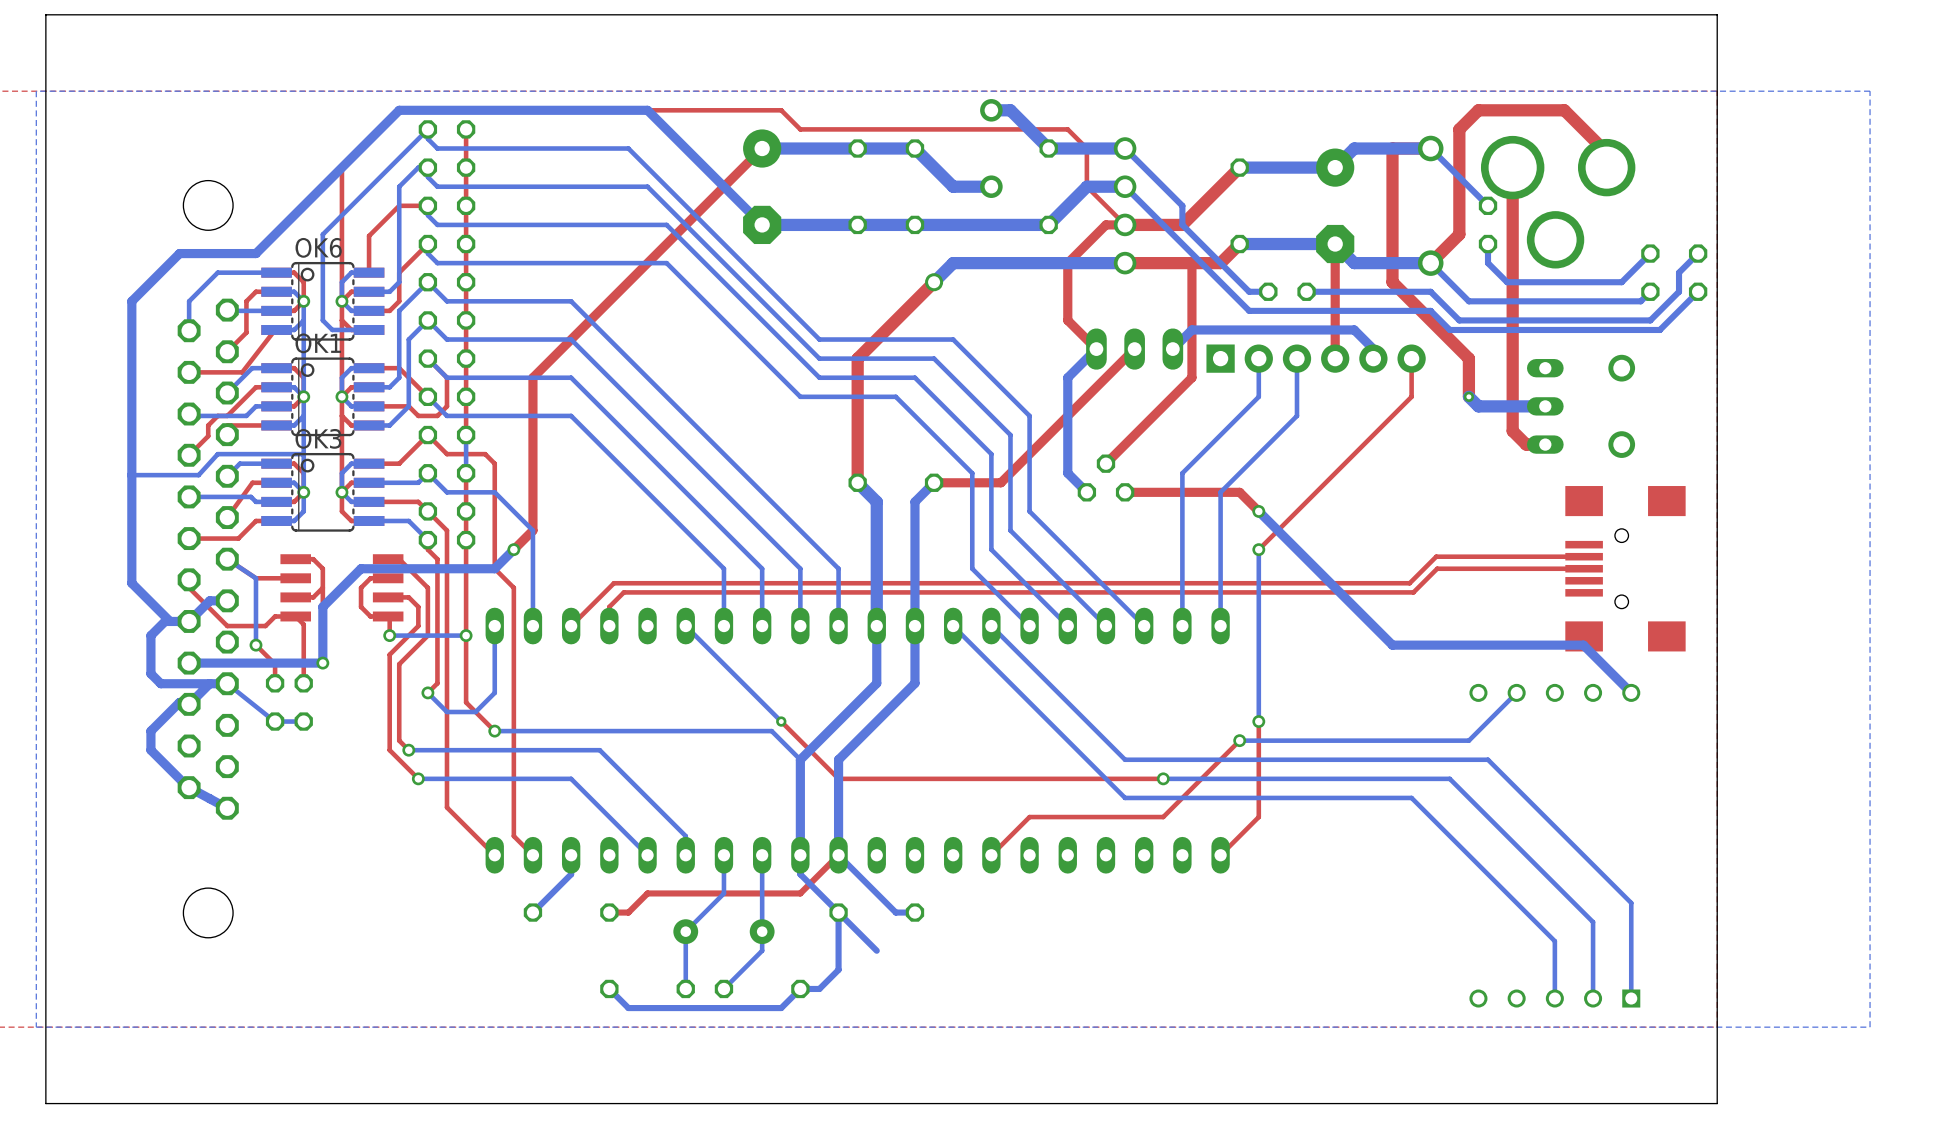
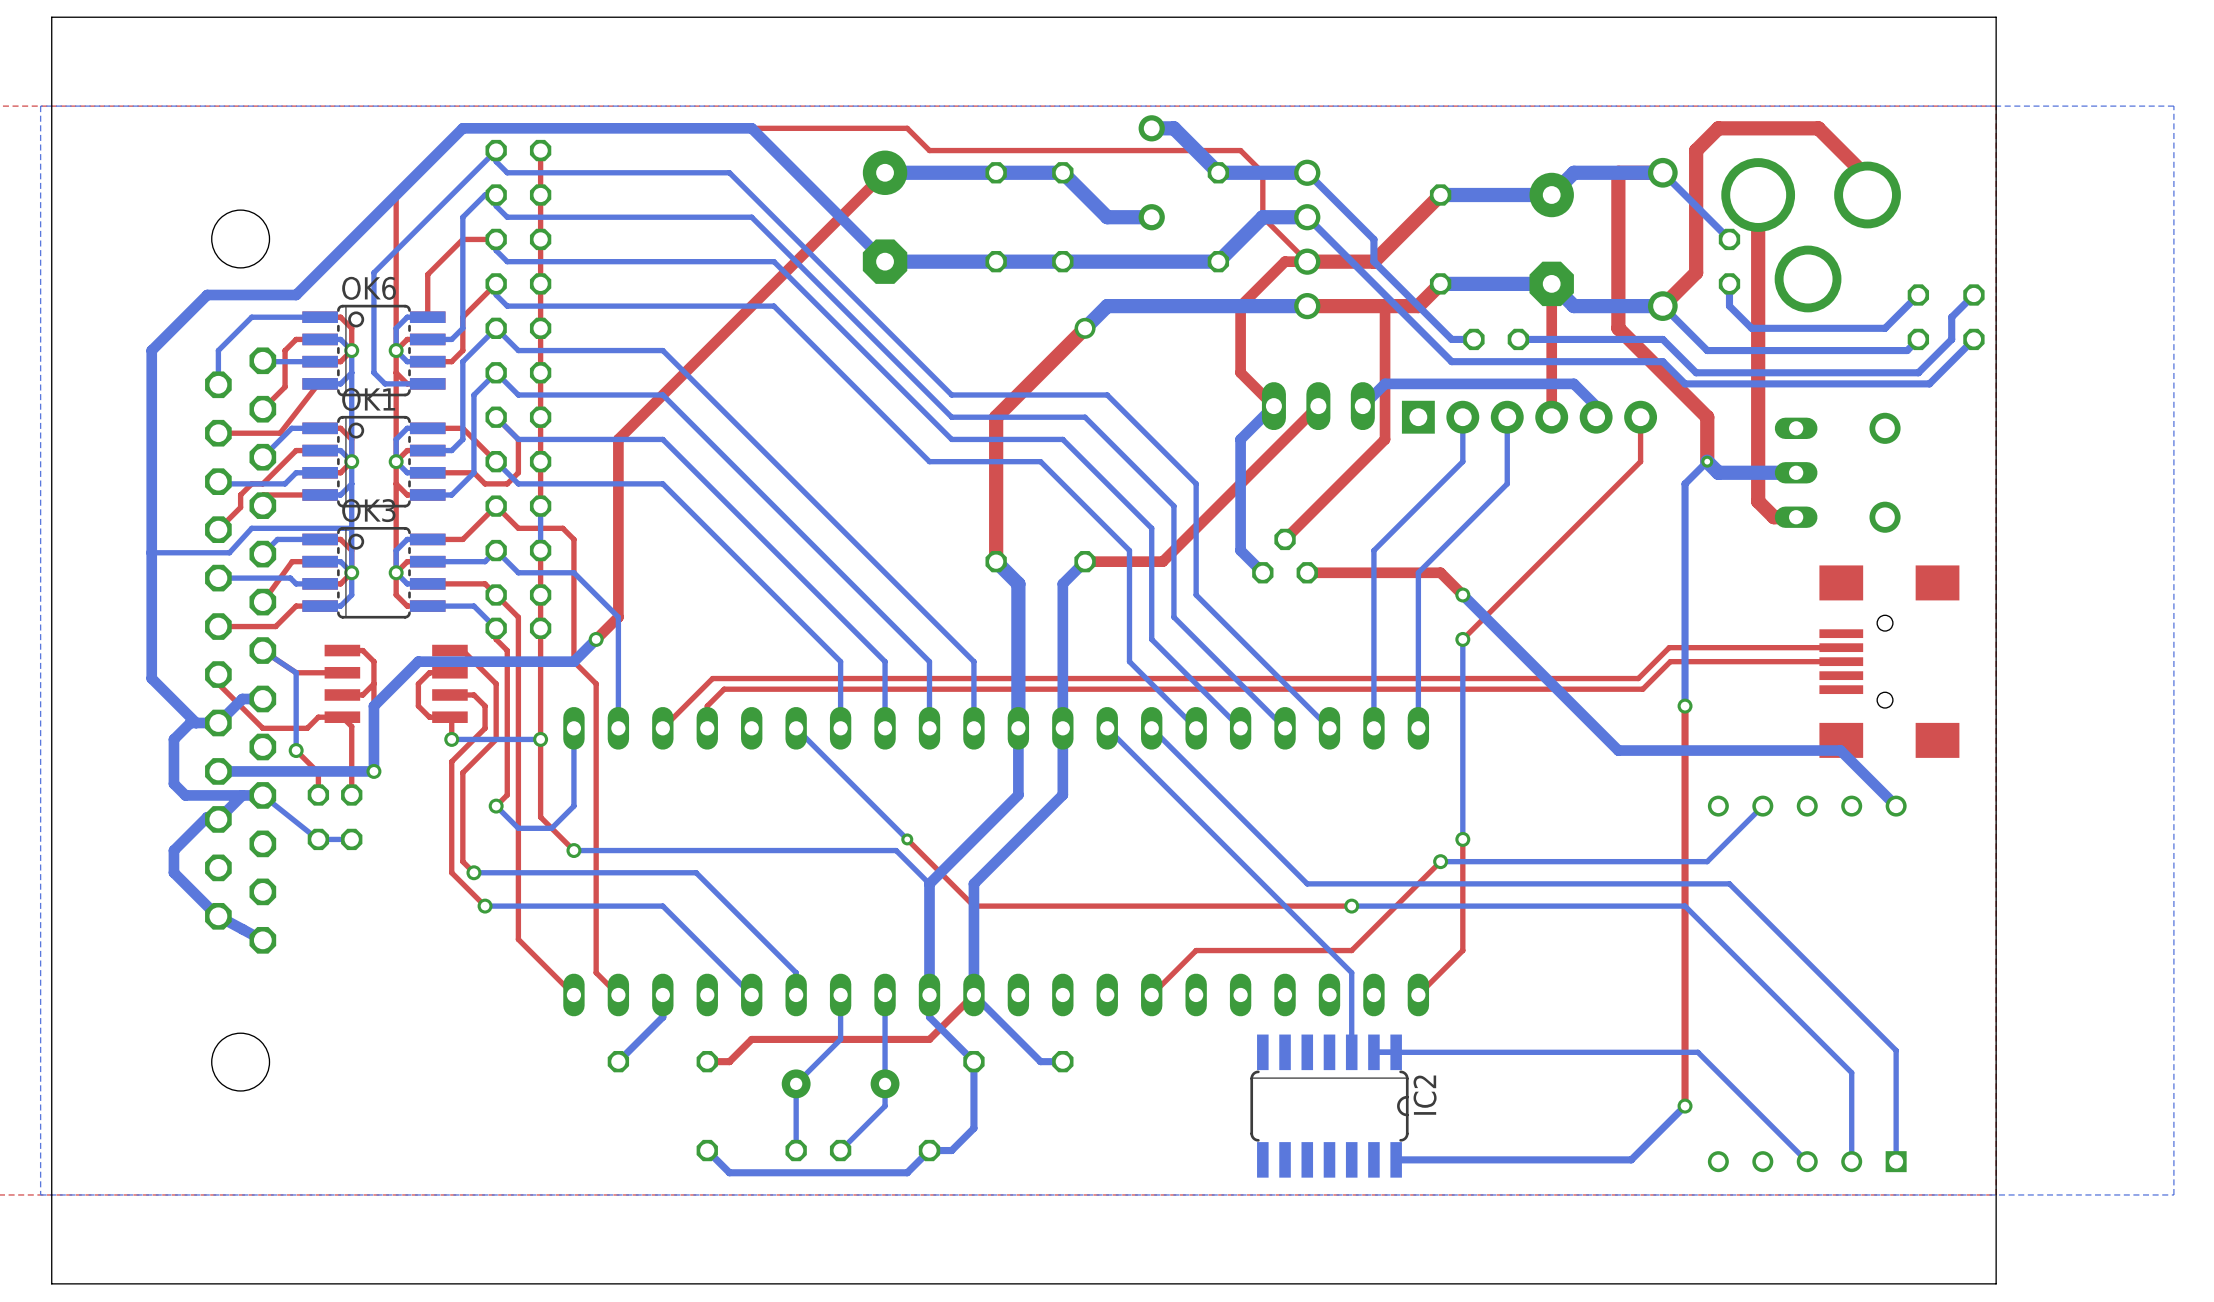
bottom track: none -> (1707, 461) (1685, 483) (1685, 706)
top track: none -> (1685, 706) (1685, 1106)
via: none -> (1685, 706)
bottom track: (1125, 797) (1411, 797) (1554, 941) (1554, 998) -> (1373, 1052) (1697, 1052) (1807, 1161)
bottom track: none -> (1307, 928) (1351, 972) (1351, 1052)
bottom track: (838, 912) (876, 950) -> none
IC2: none -> (1329, 1106)
bottom track: none -> (1685, 1106) (1631, 1159) (1396, 1159)
via: none -> (1685, 1106)

